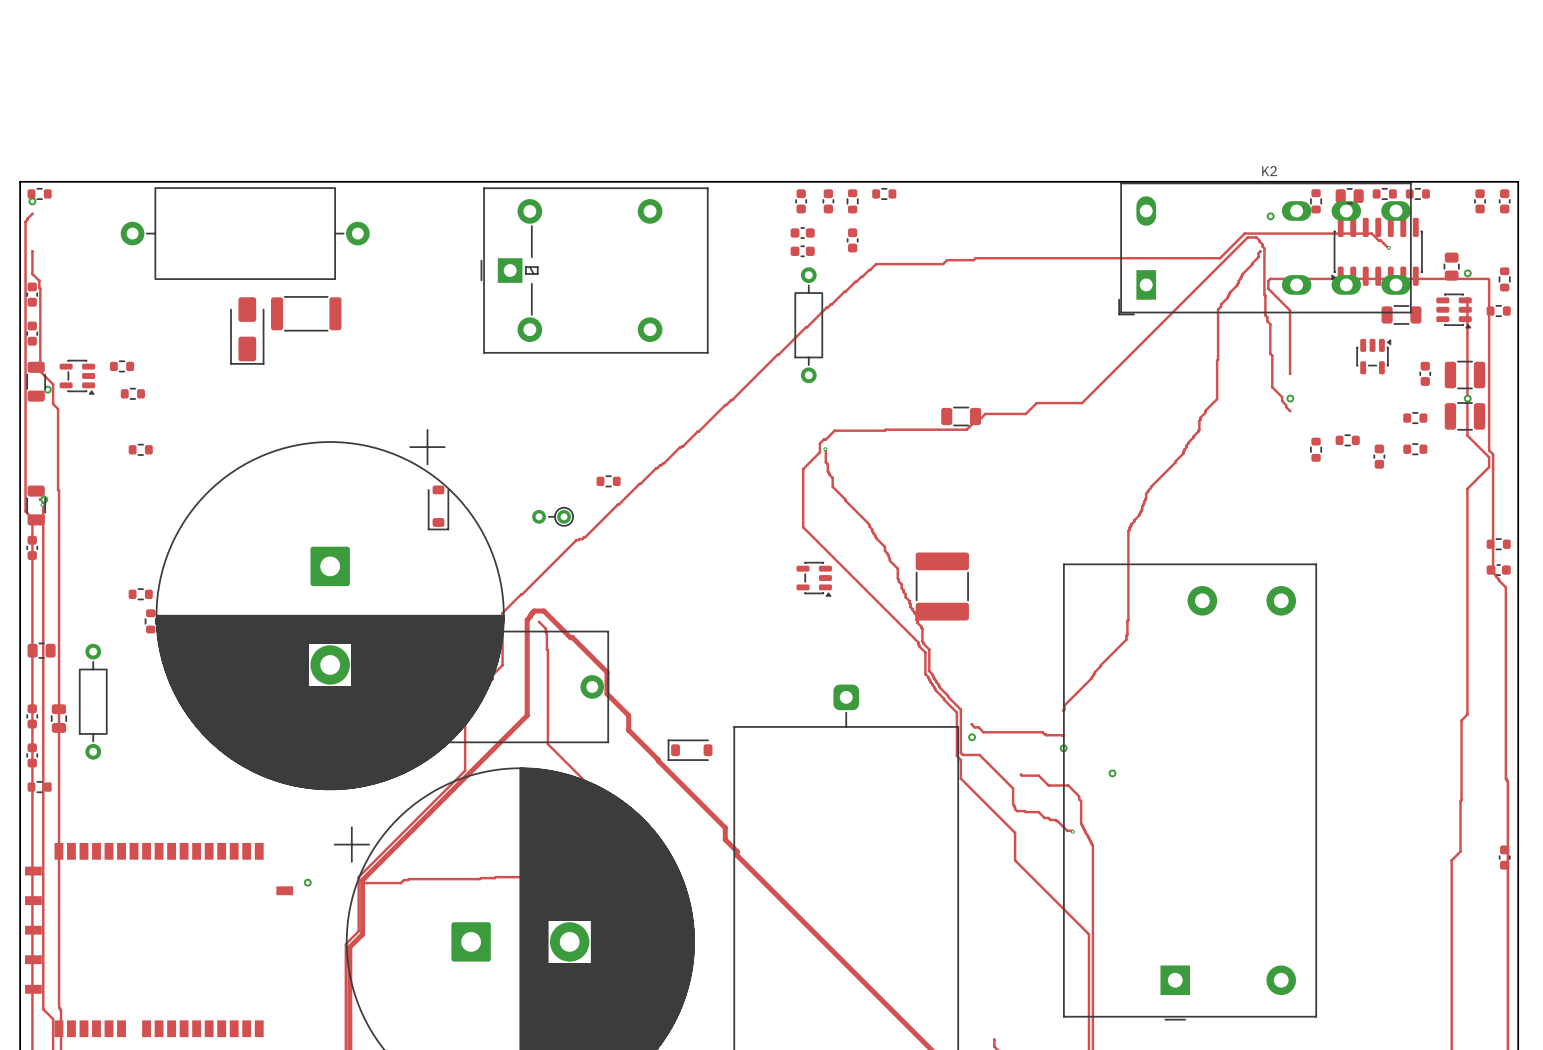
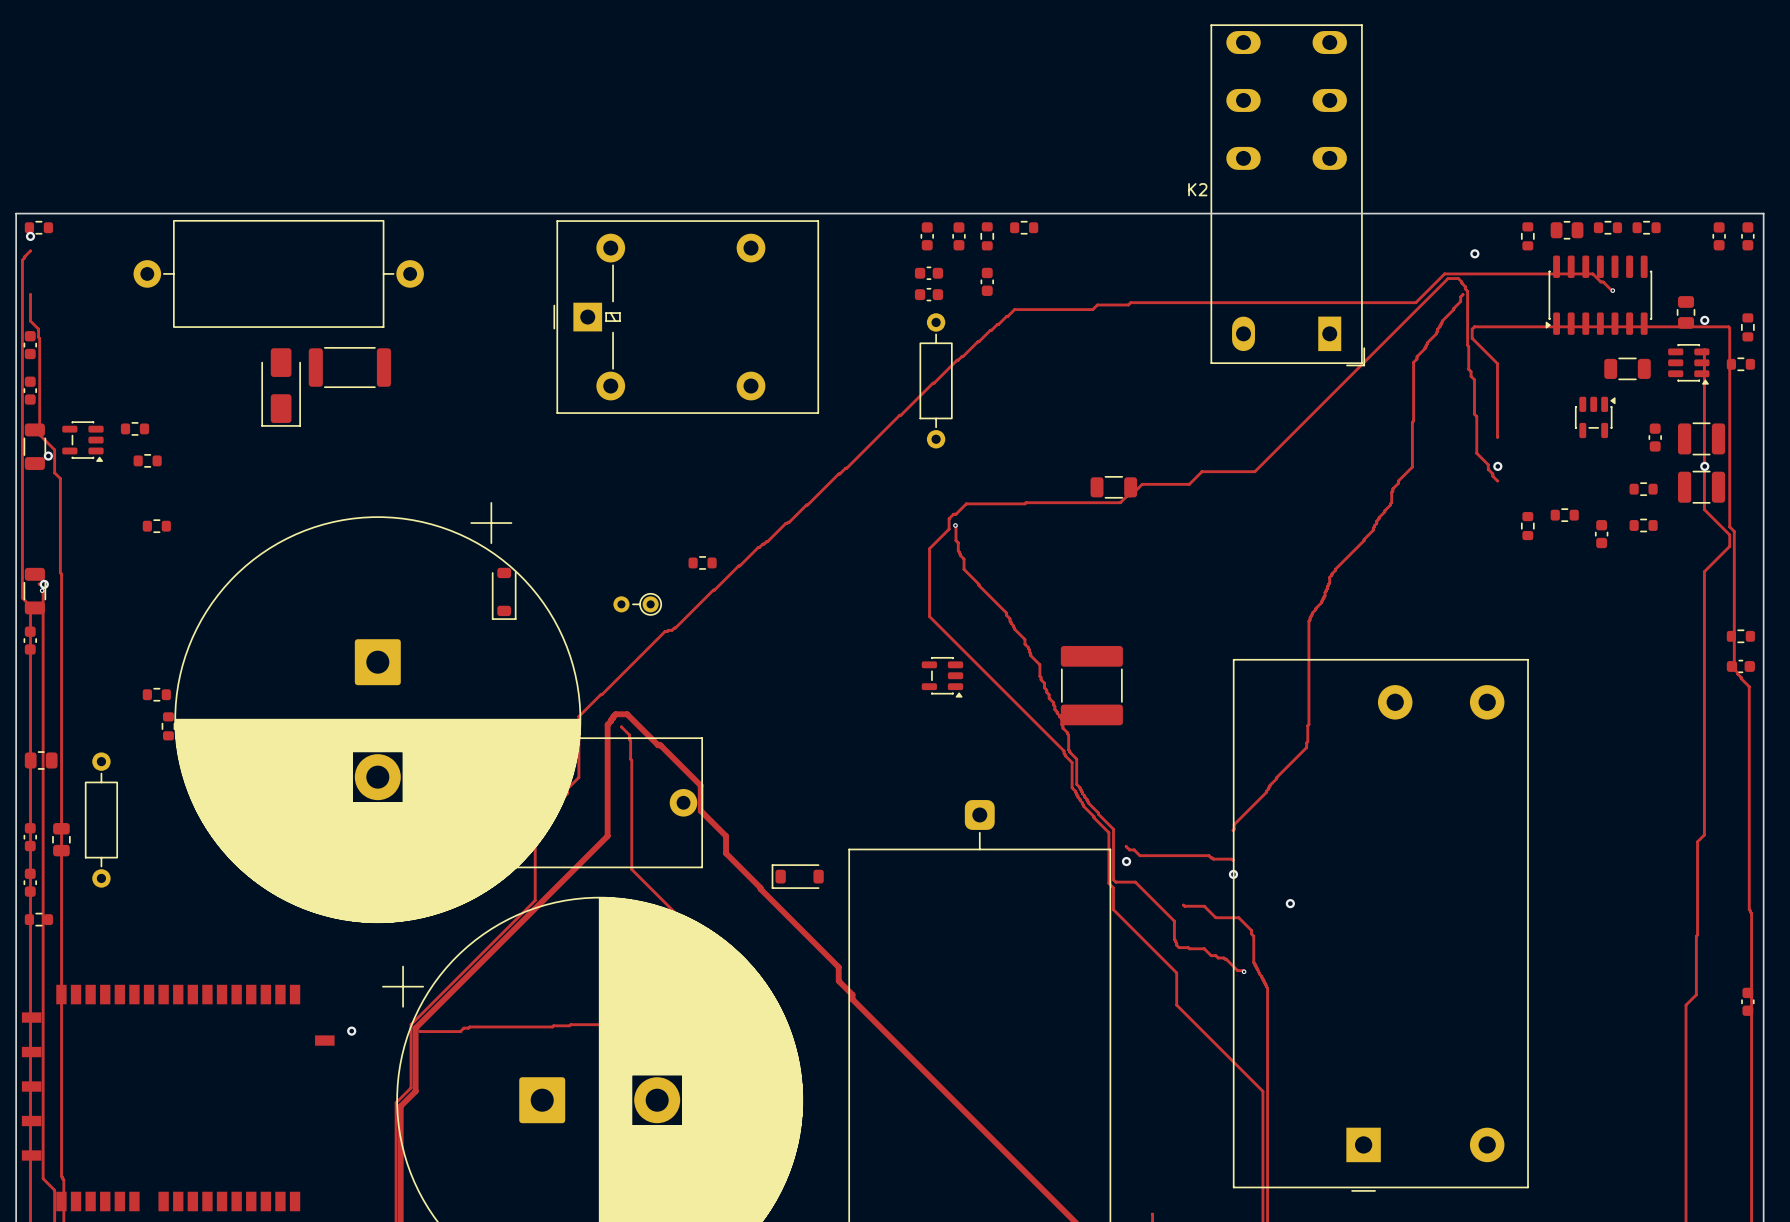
K2 name position: K2 (1269, 171) -> K2 (1197, 189)
K2 footprint: [1118, 182, 1412, 316] -> [1210, 24, 1365, 367]

